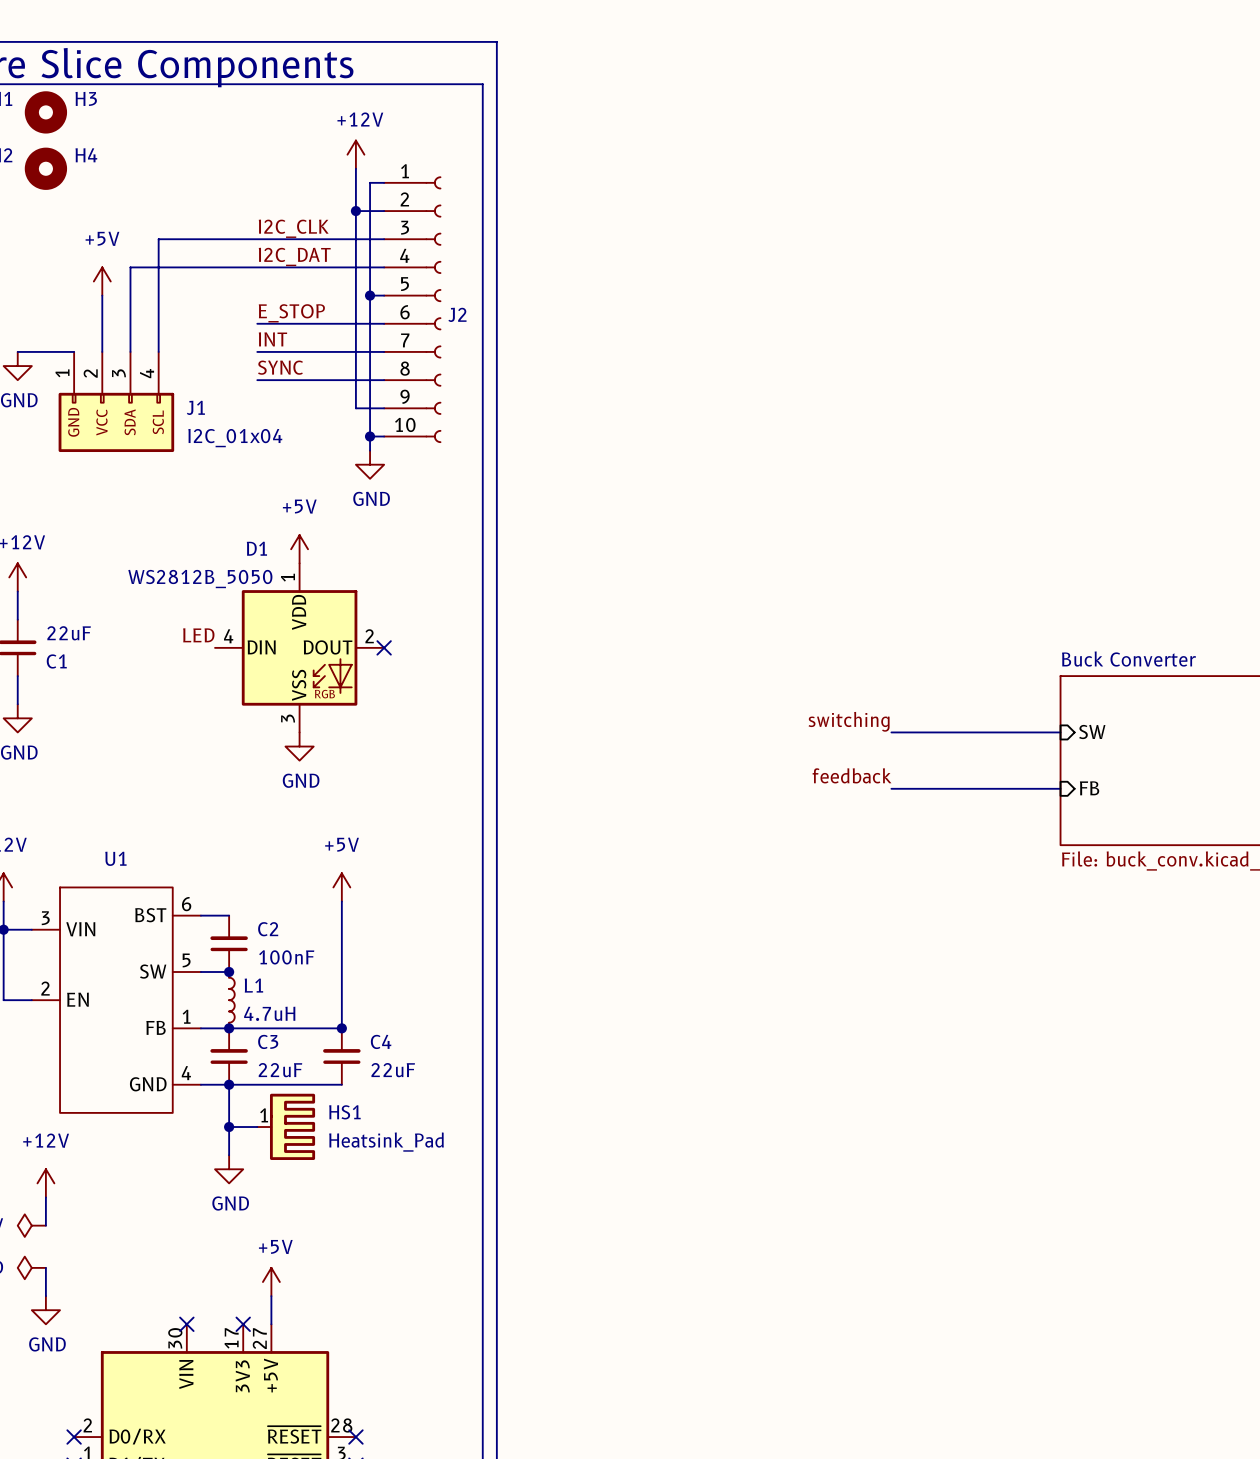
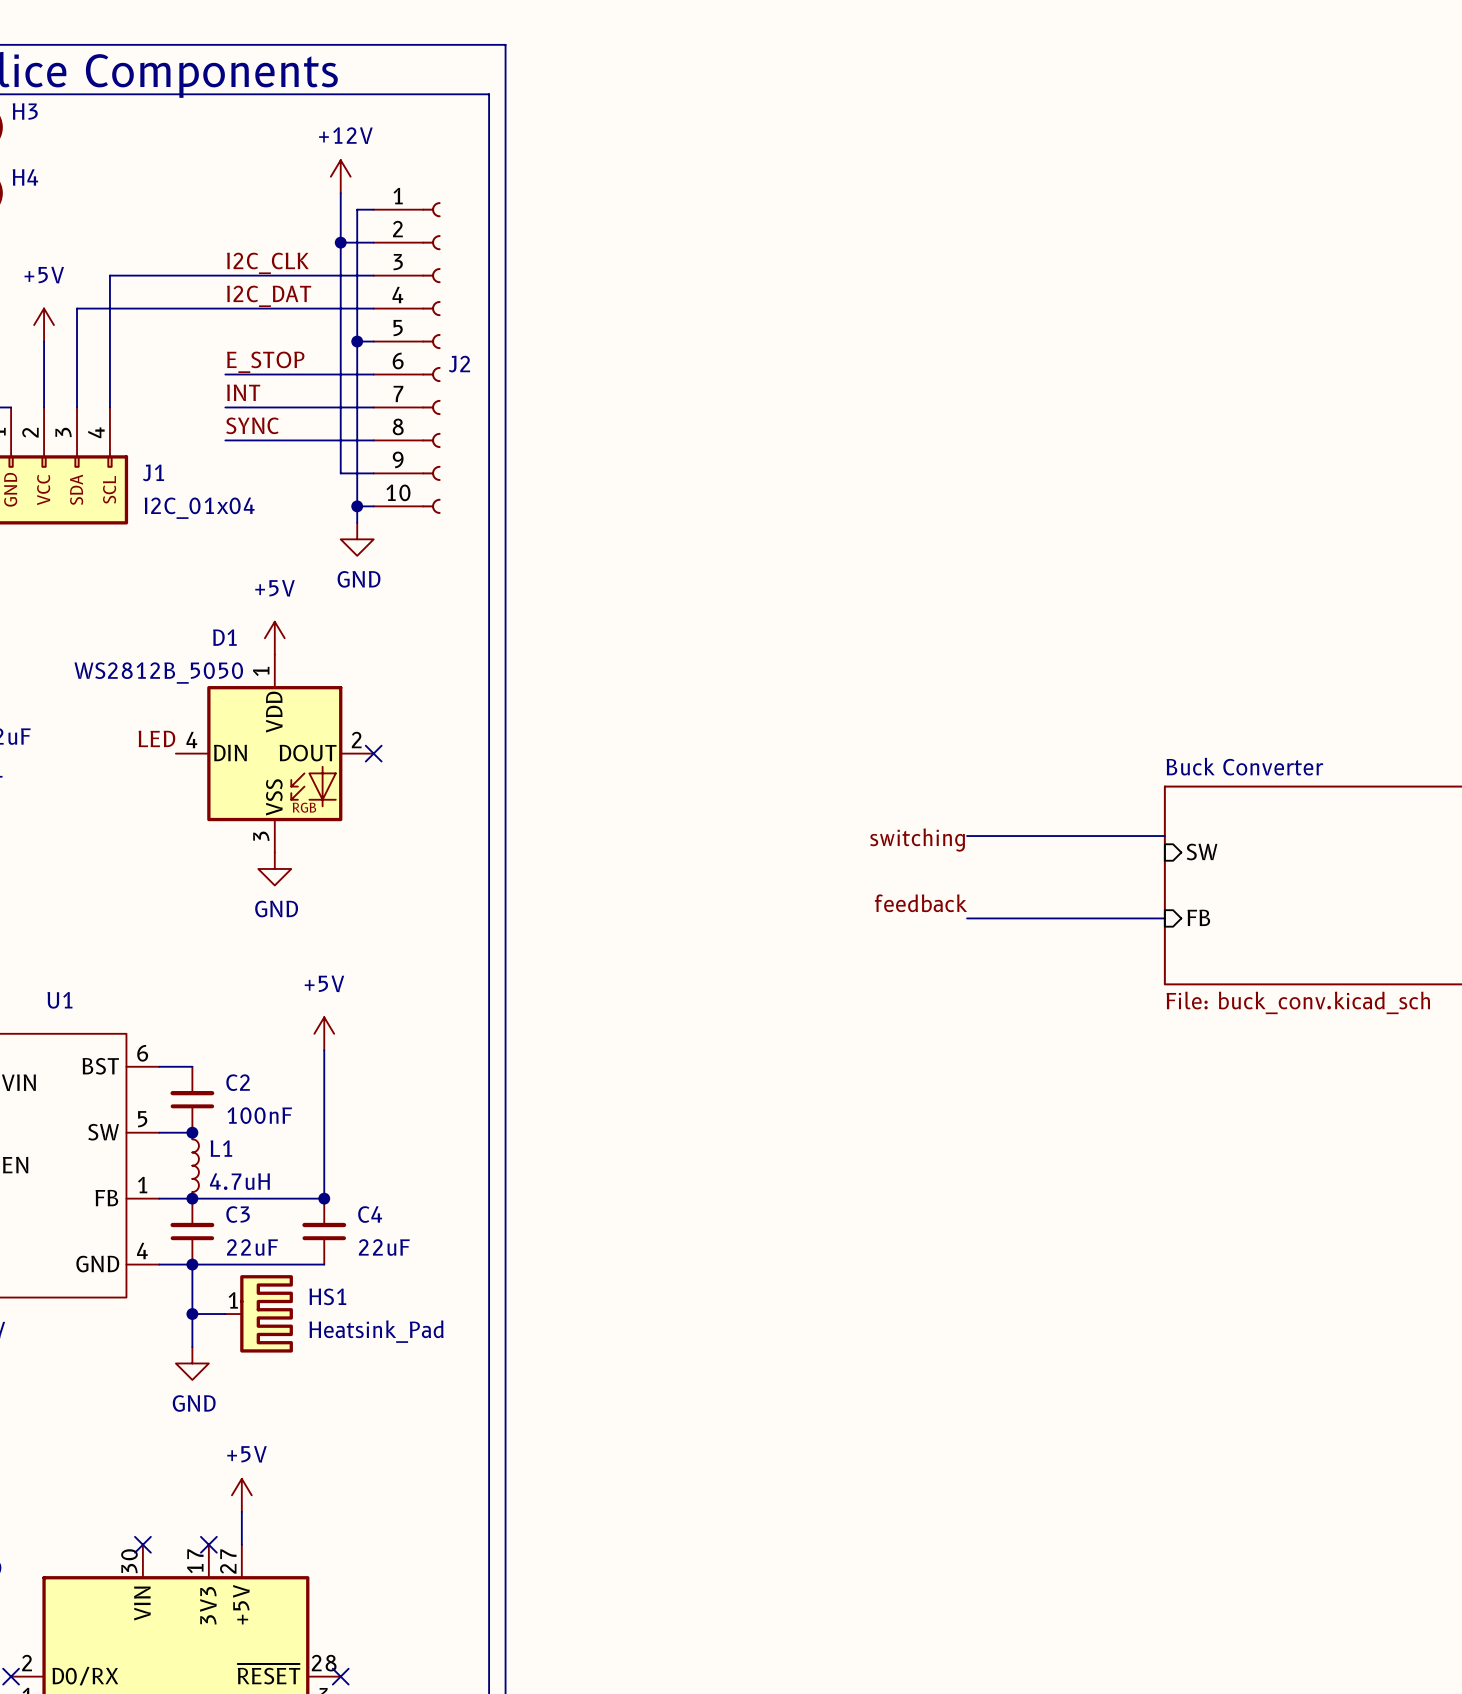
wire: (891, 732) (1060, 732) -> (967, 836) (1164, 836)

